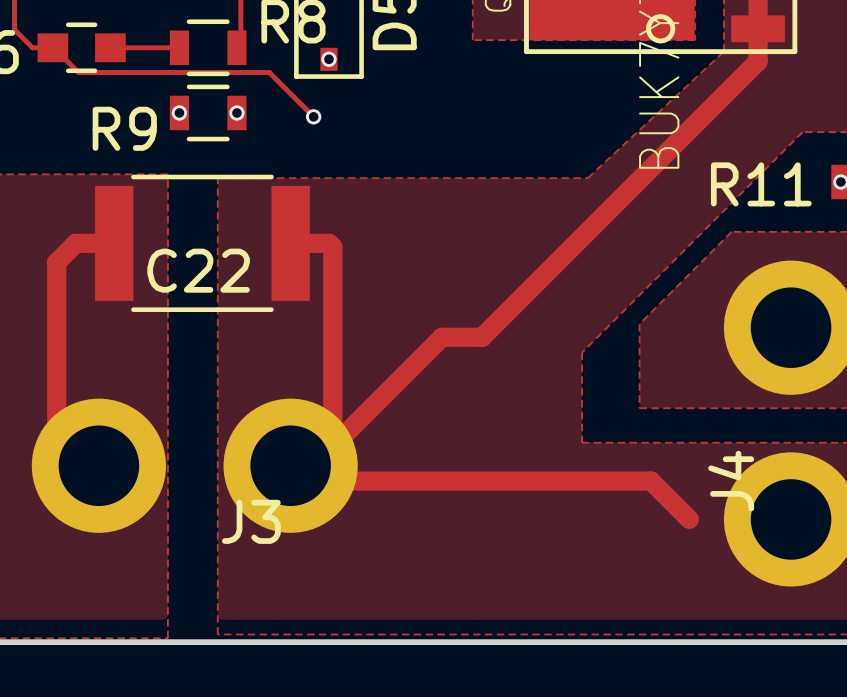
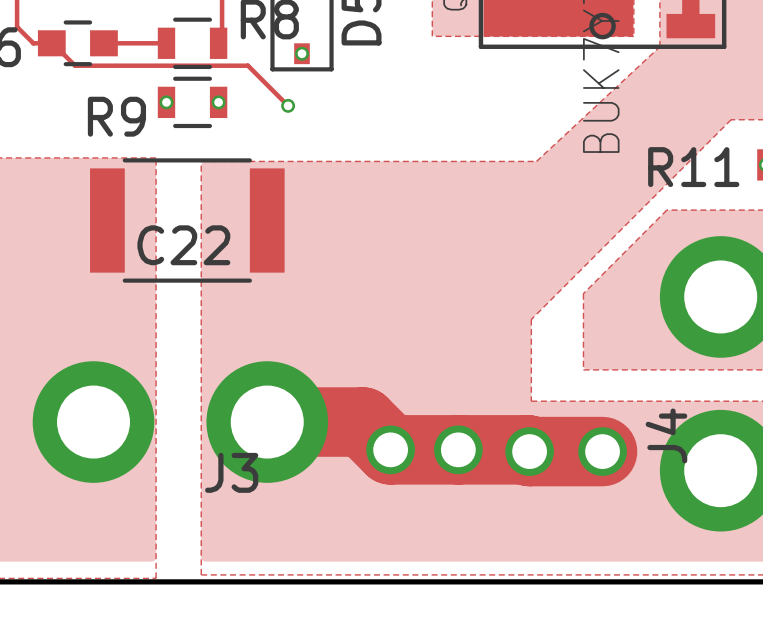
track: (758, 28) (758, 61) (482, 337) (442, 337) (332, 446) (332, 247) (328, 243) (290, 243) -> none
track: (114, 243) (75, 243) (56, 262) (56, 481) -> none
track: none -> (267, 422) (362, 422) (390, 449) (602, 451)
track: (332, 481) (651, 481) (689, 519) -> none
via: none -> (390, 449)
via: none -> (458, 449)
via: none -> (529, 451)
via: none -> (602, 451)

